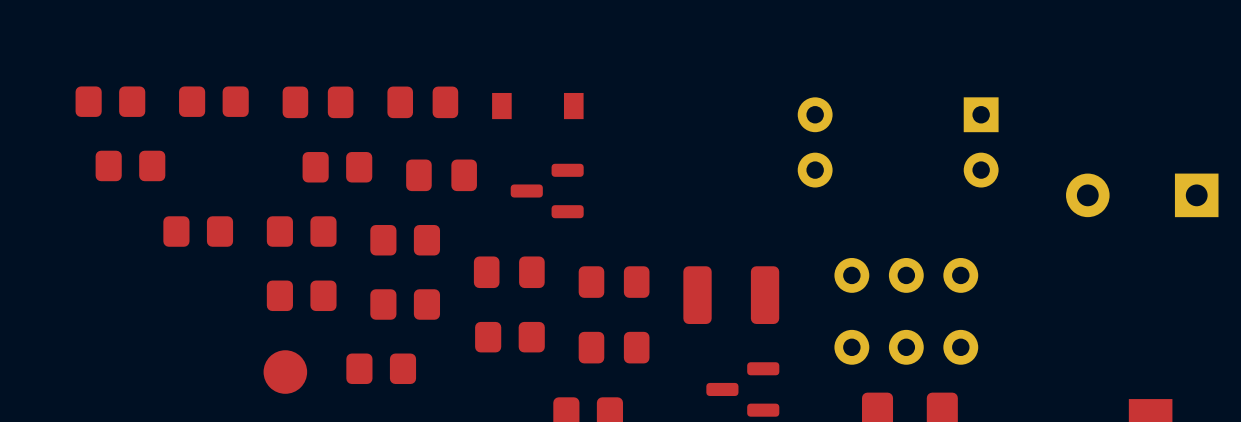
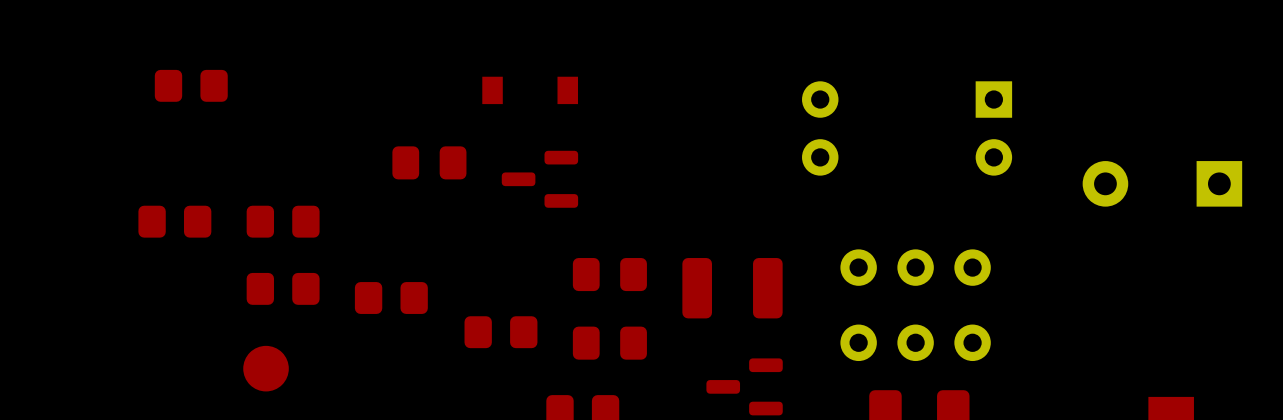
part: (110, 101) -> none
part: (318, 102) -> none
part: (422, 102) -> none
part: (130, 165) -> none
part: (337, 167) -> none
part: (405, 240) -> none
part: (509, 272) -> none
part: (381, 368) -> none

